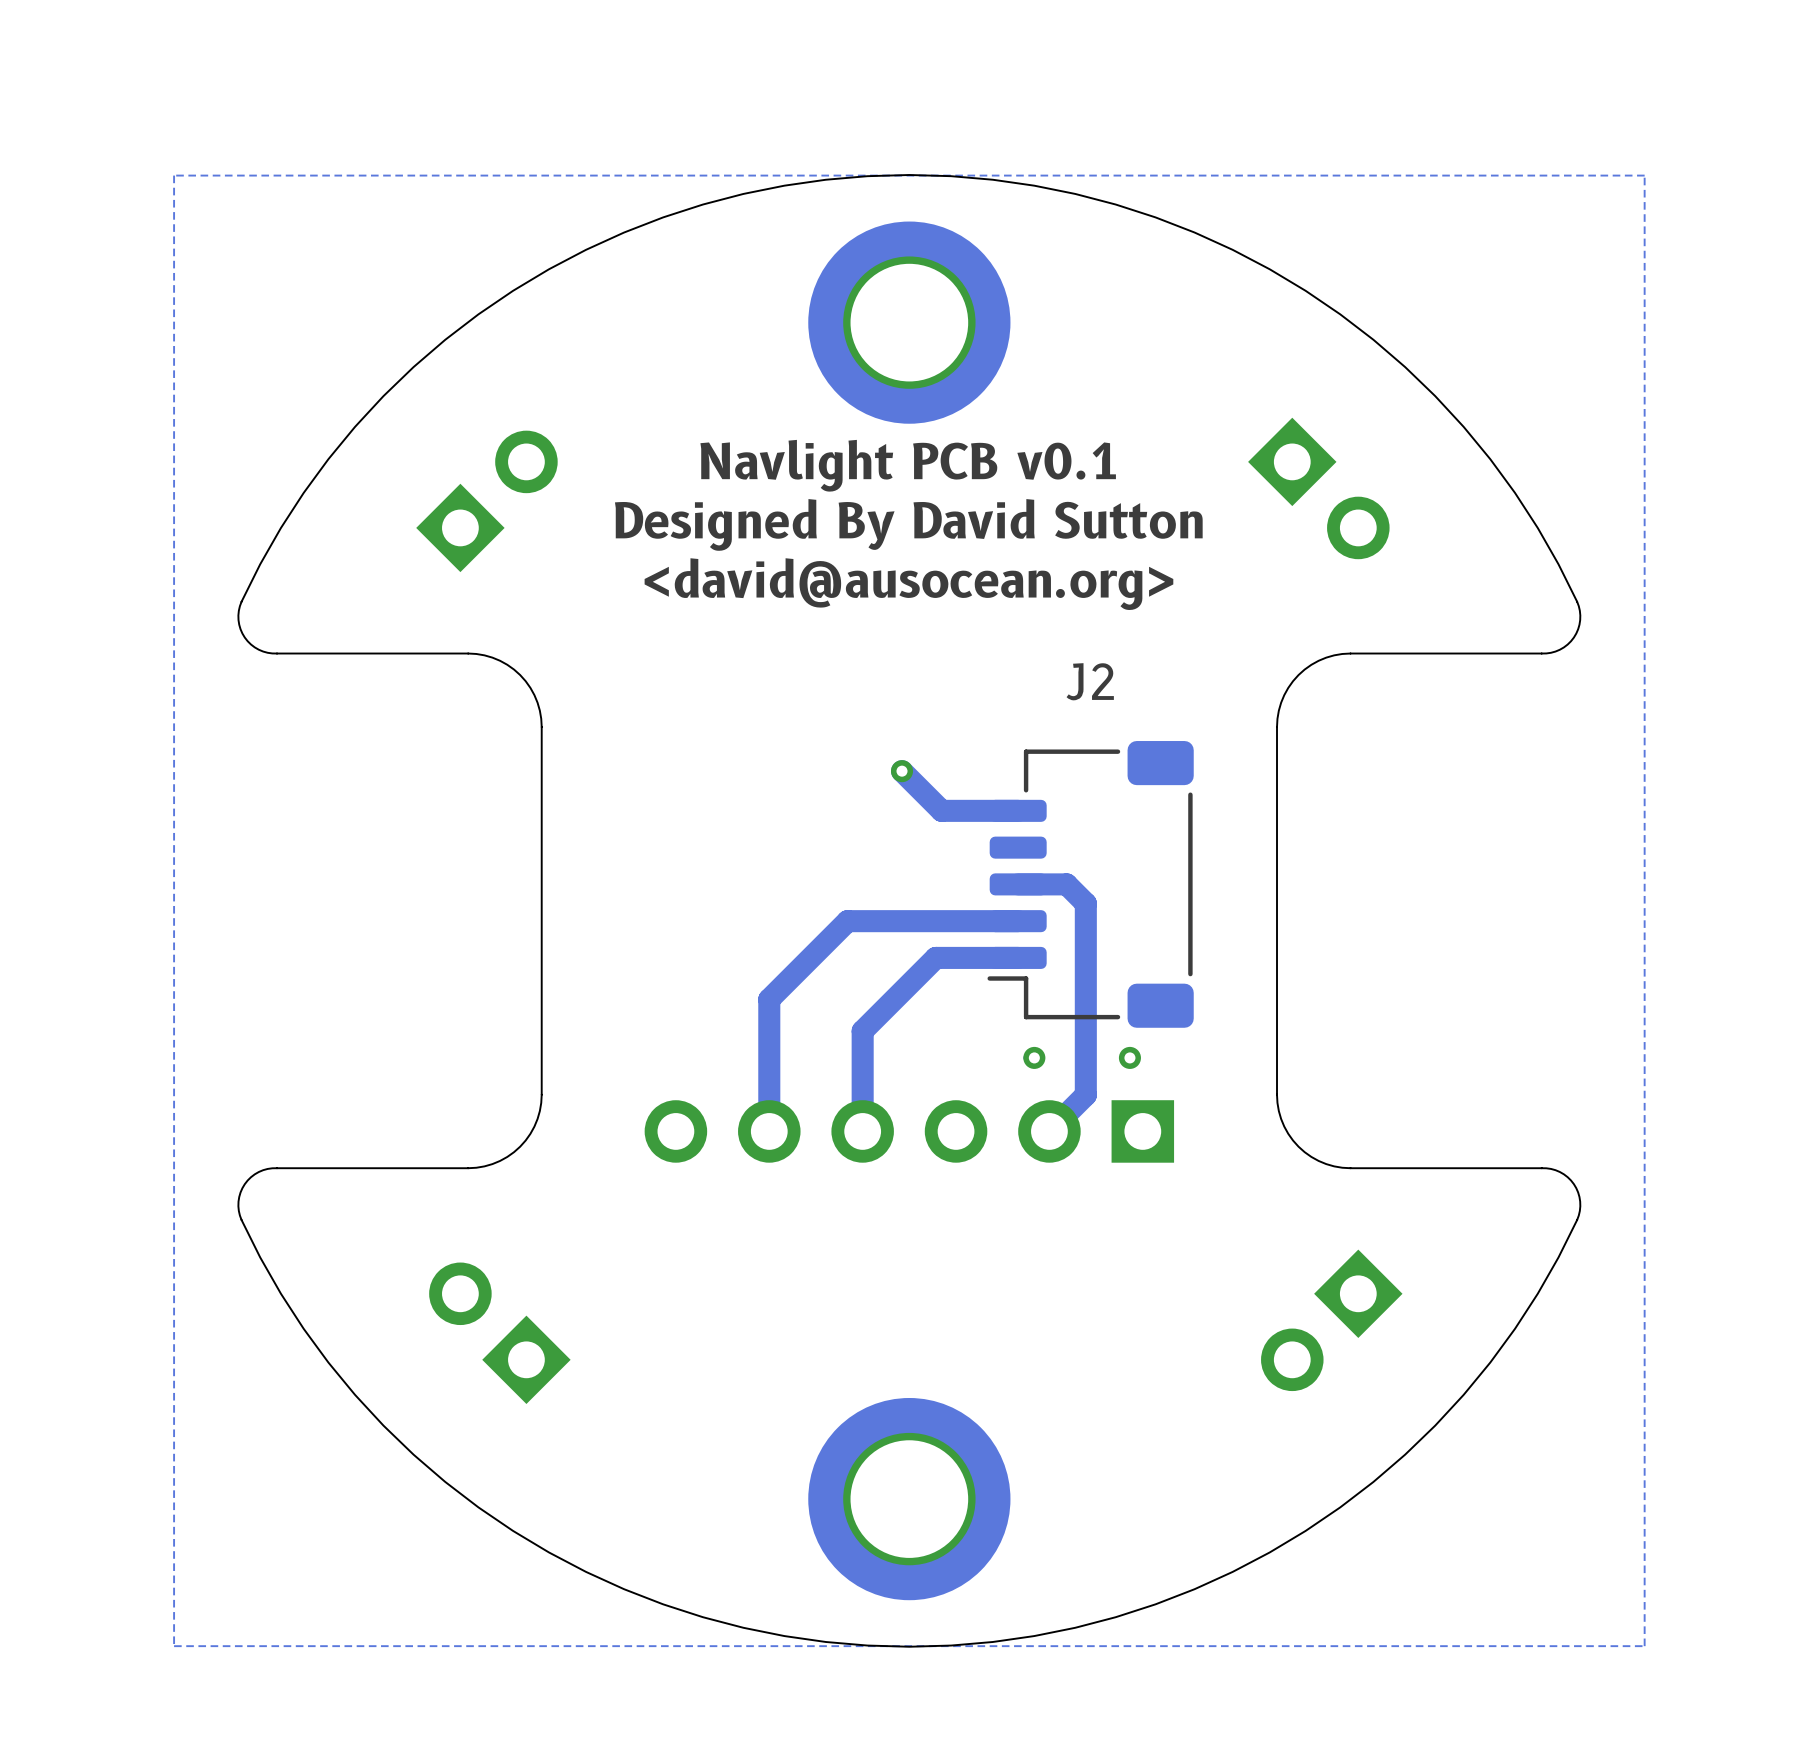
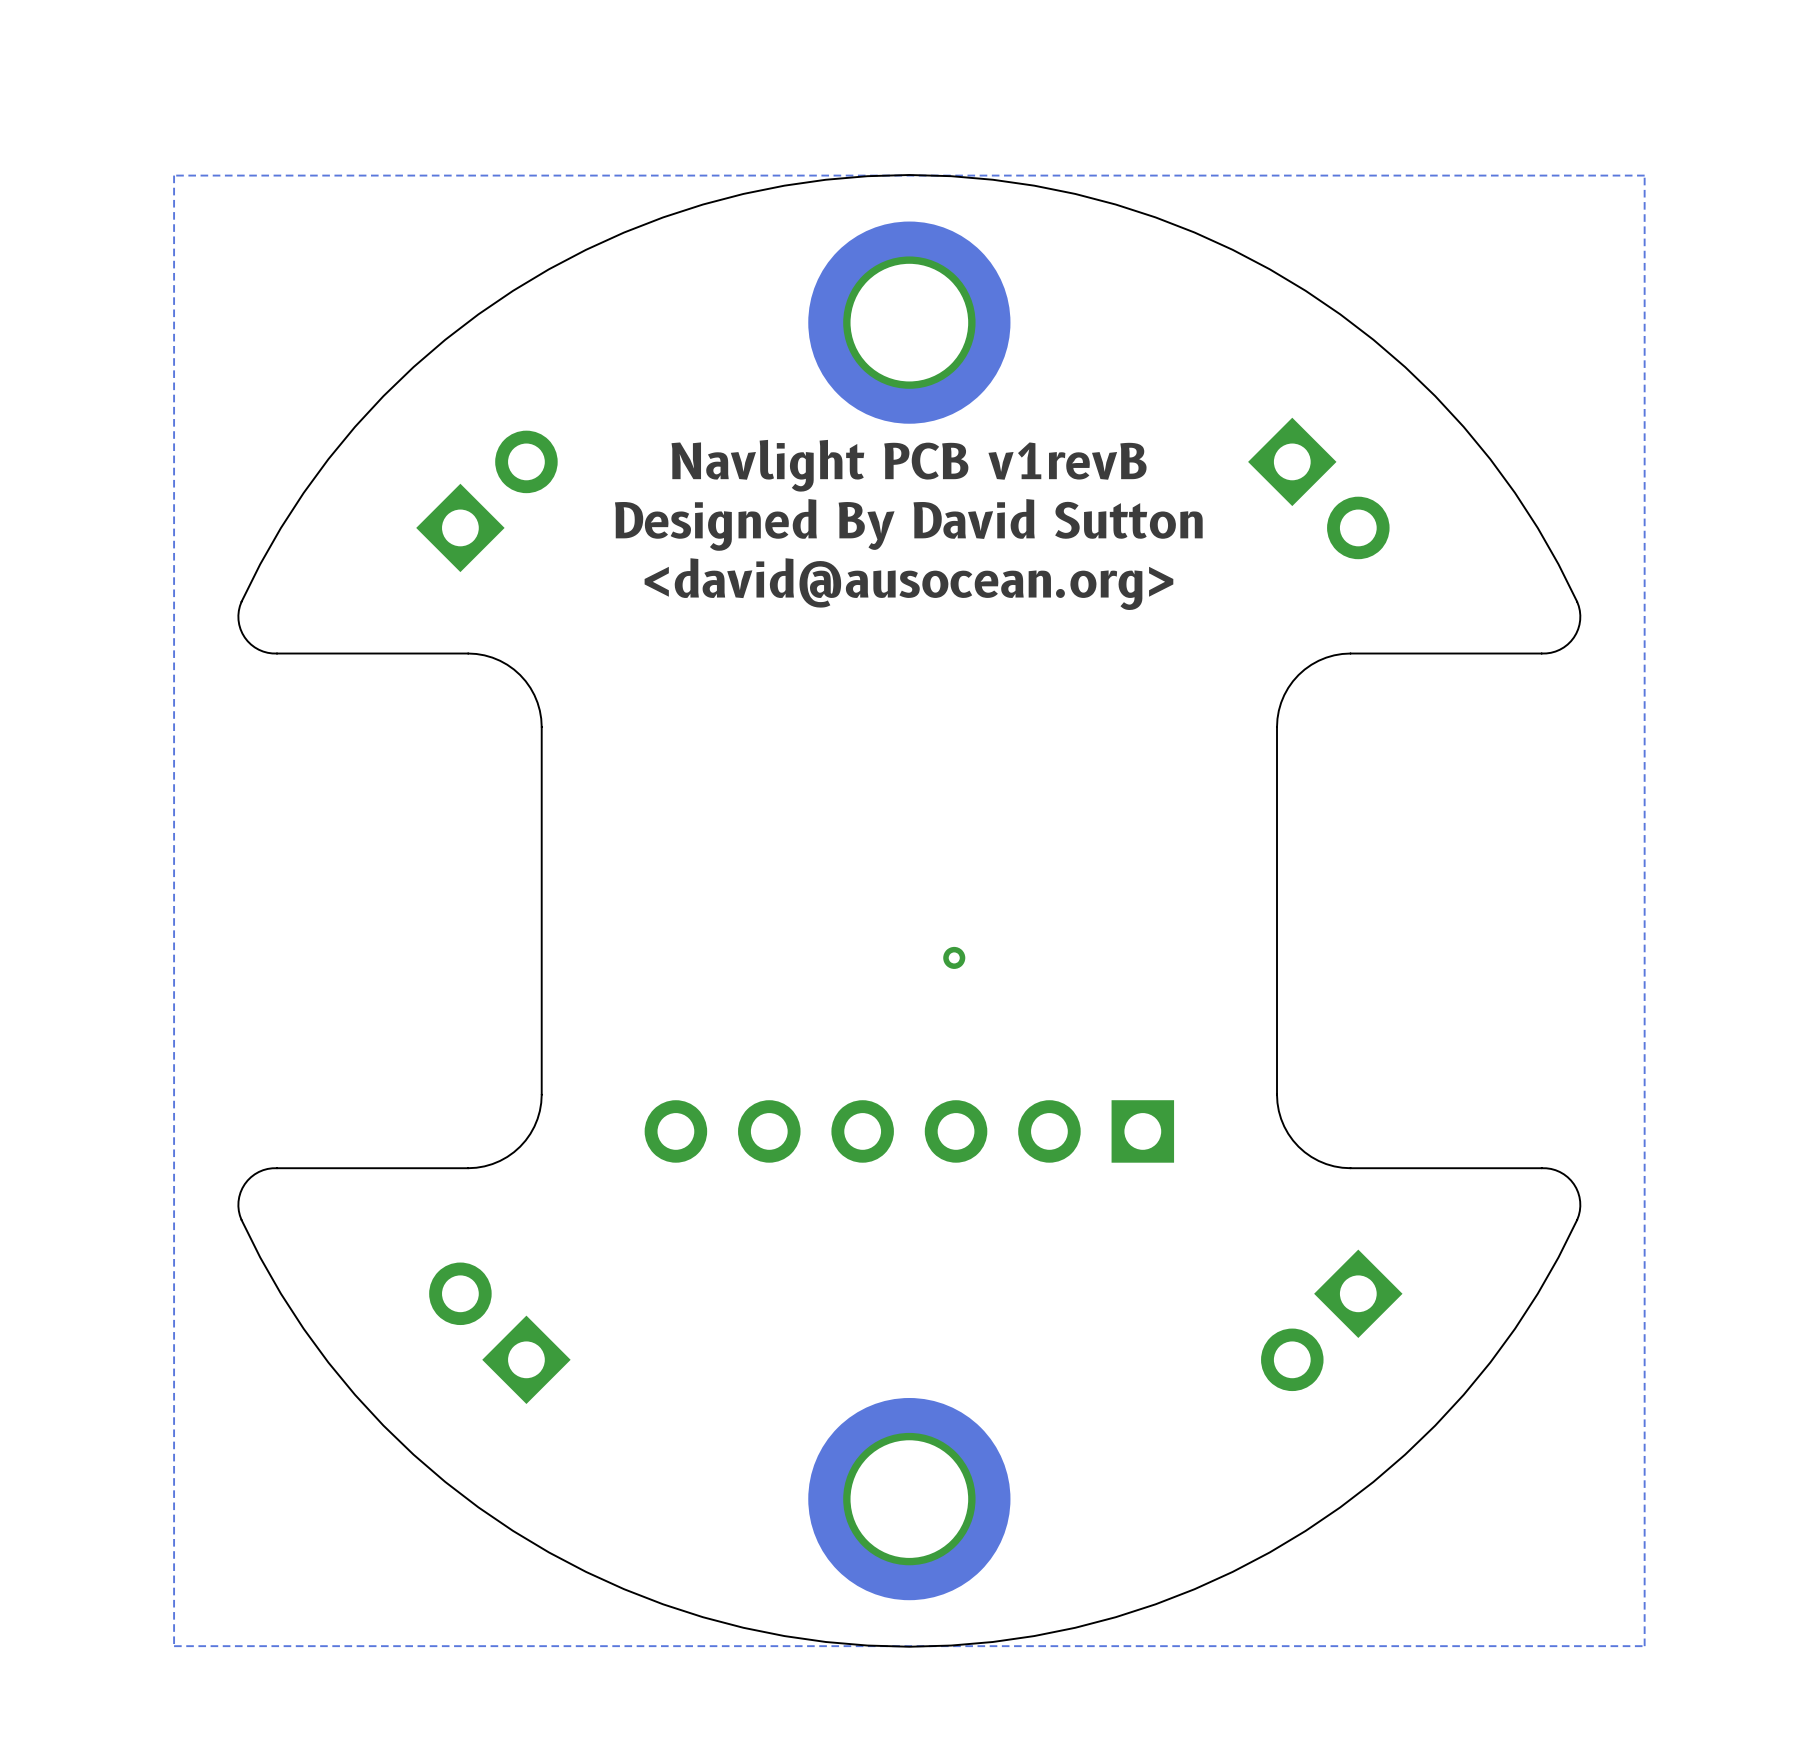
text: Navlight PCB v0.1 (908, 465) -> Navlight PCB v1revB (909, 465)
track: (902, 771) (941, 810) (1018, 810) -> none
via: (902, 771) -> none
track: (1018, 884) (1066, 884) (1085, 903) (1085, 1095) (1049, 1131) -> none
J2: (1090, 884) -> none
track: (1018, 921) (847, 921) (769, 999) (769, 1131) -> none
via: none -> (954, 957)
track: (1018, 957) (935, 957) (862, 1031) (862, 1131) -> none
via: (1034, 1057) -> none
via: (1129, 1057) -> none

